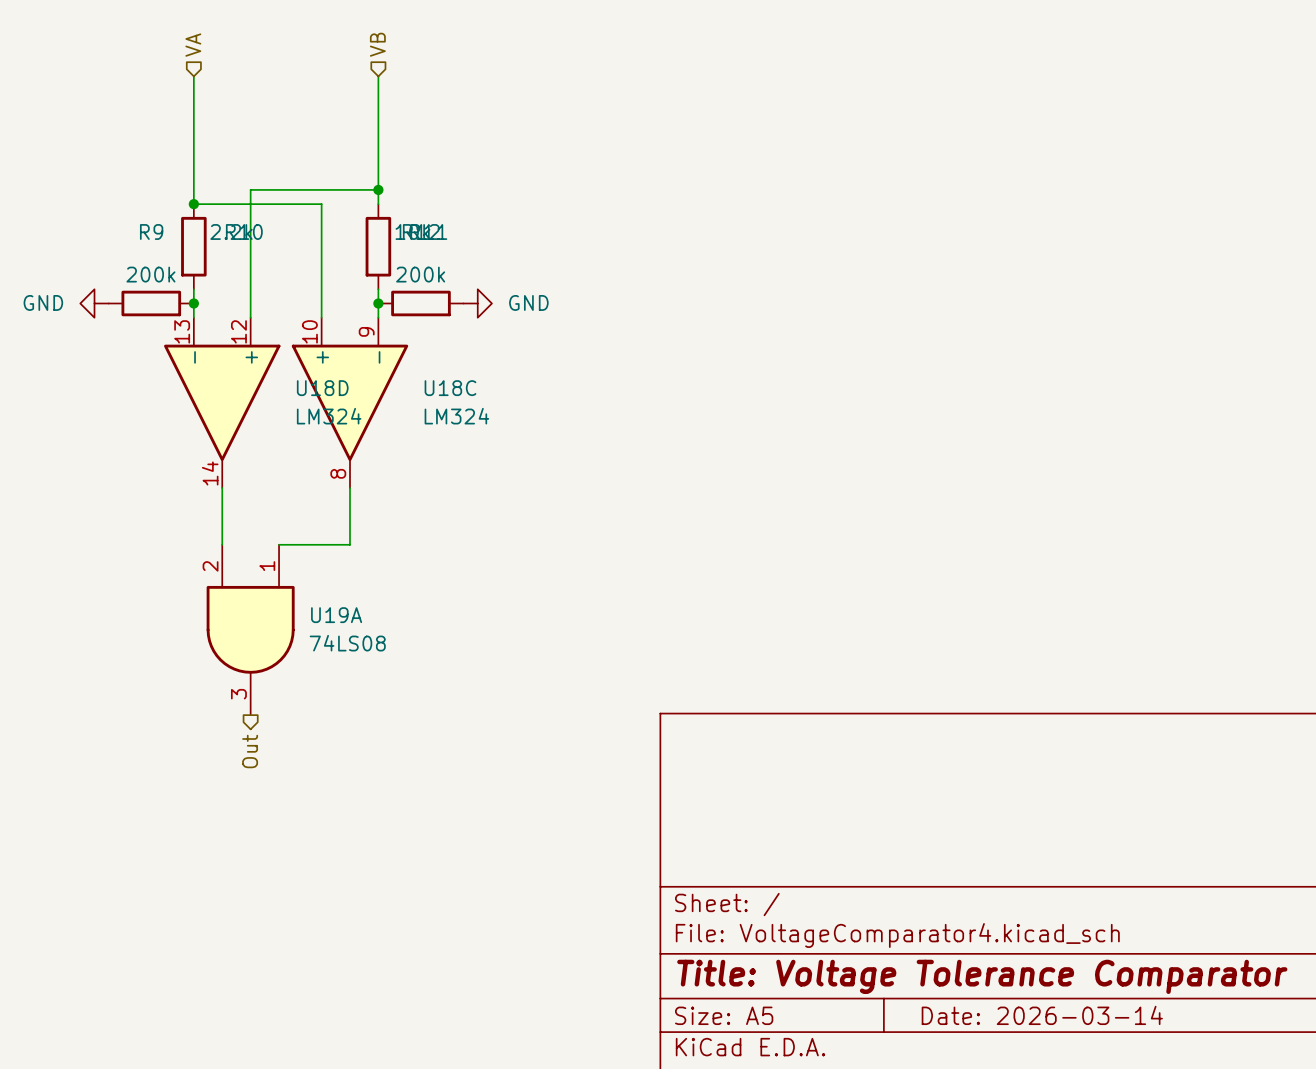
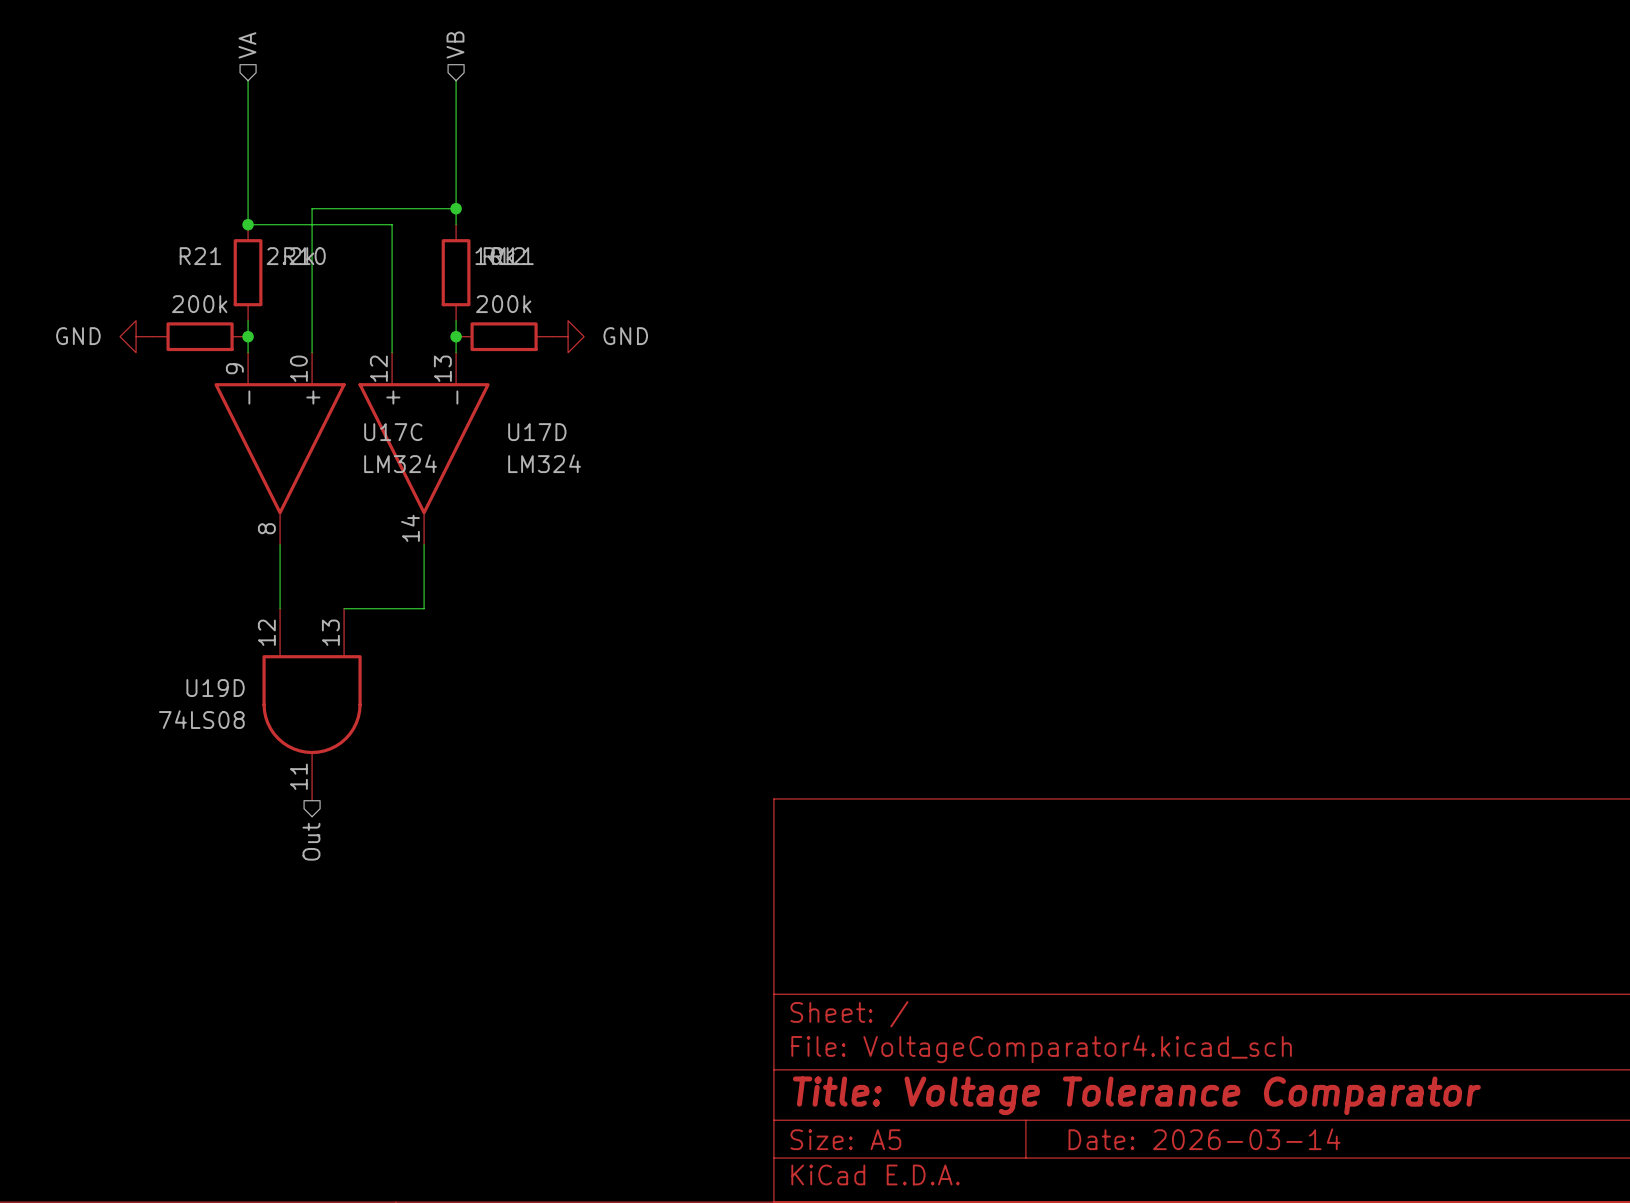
R9 name: R9 (151, 231) -> R21 (200, 256)
U18D pin number: 13 (182, 331) -> 9 (234, 368)
U18D pin number: 12 (238, 331) -> 10 (298, 368)
U18C pin number: 10 (309, 331) -> 12 (378, 368)
U18C pin number: 9 (366, 331) -> 13 (442, 368)
U18D name: U18D (322, 388) -> U17C (393, 432)
U18C name: U18C (450, 388) -> U17D (537, 432)
U18D pin number: 14 (210, 473) -> 8 (266, 528)
U18C pin number: 8 (338, 473) -> 14 (410, 528)
U19A pin number: 2 (210, 566) -> 12 (266, 632)
U19A pin number: 1 (267, 566) -> 13 (330, 632)
U19A name: U19A (336, 615) -> U19D (215, 688)
U19A value position: 74LS08 (347, 643) -> 74LS08 (201, 719)
U19A pin number: 3 (238, 694) -> 11 (298, 776)

